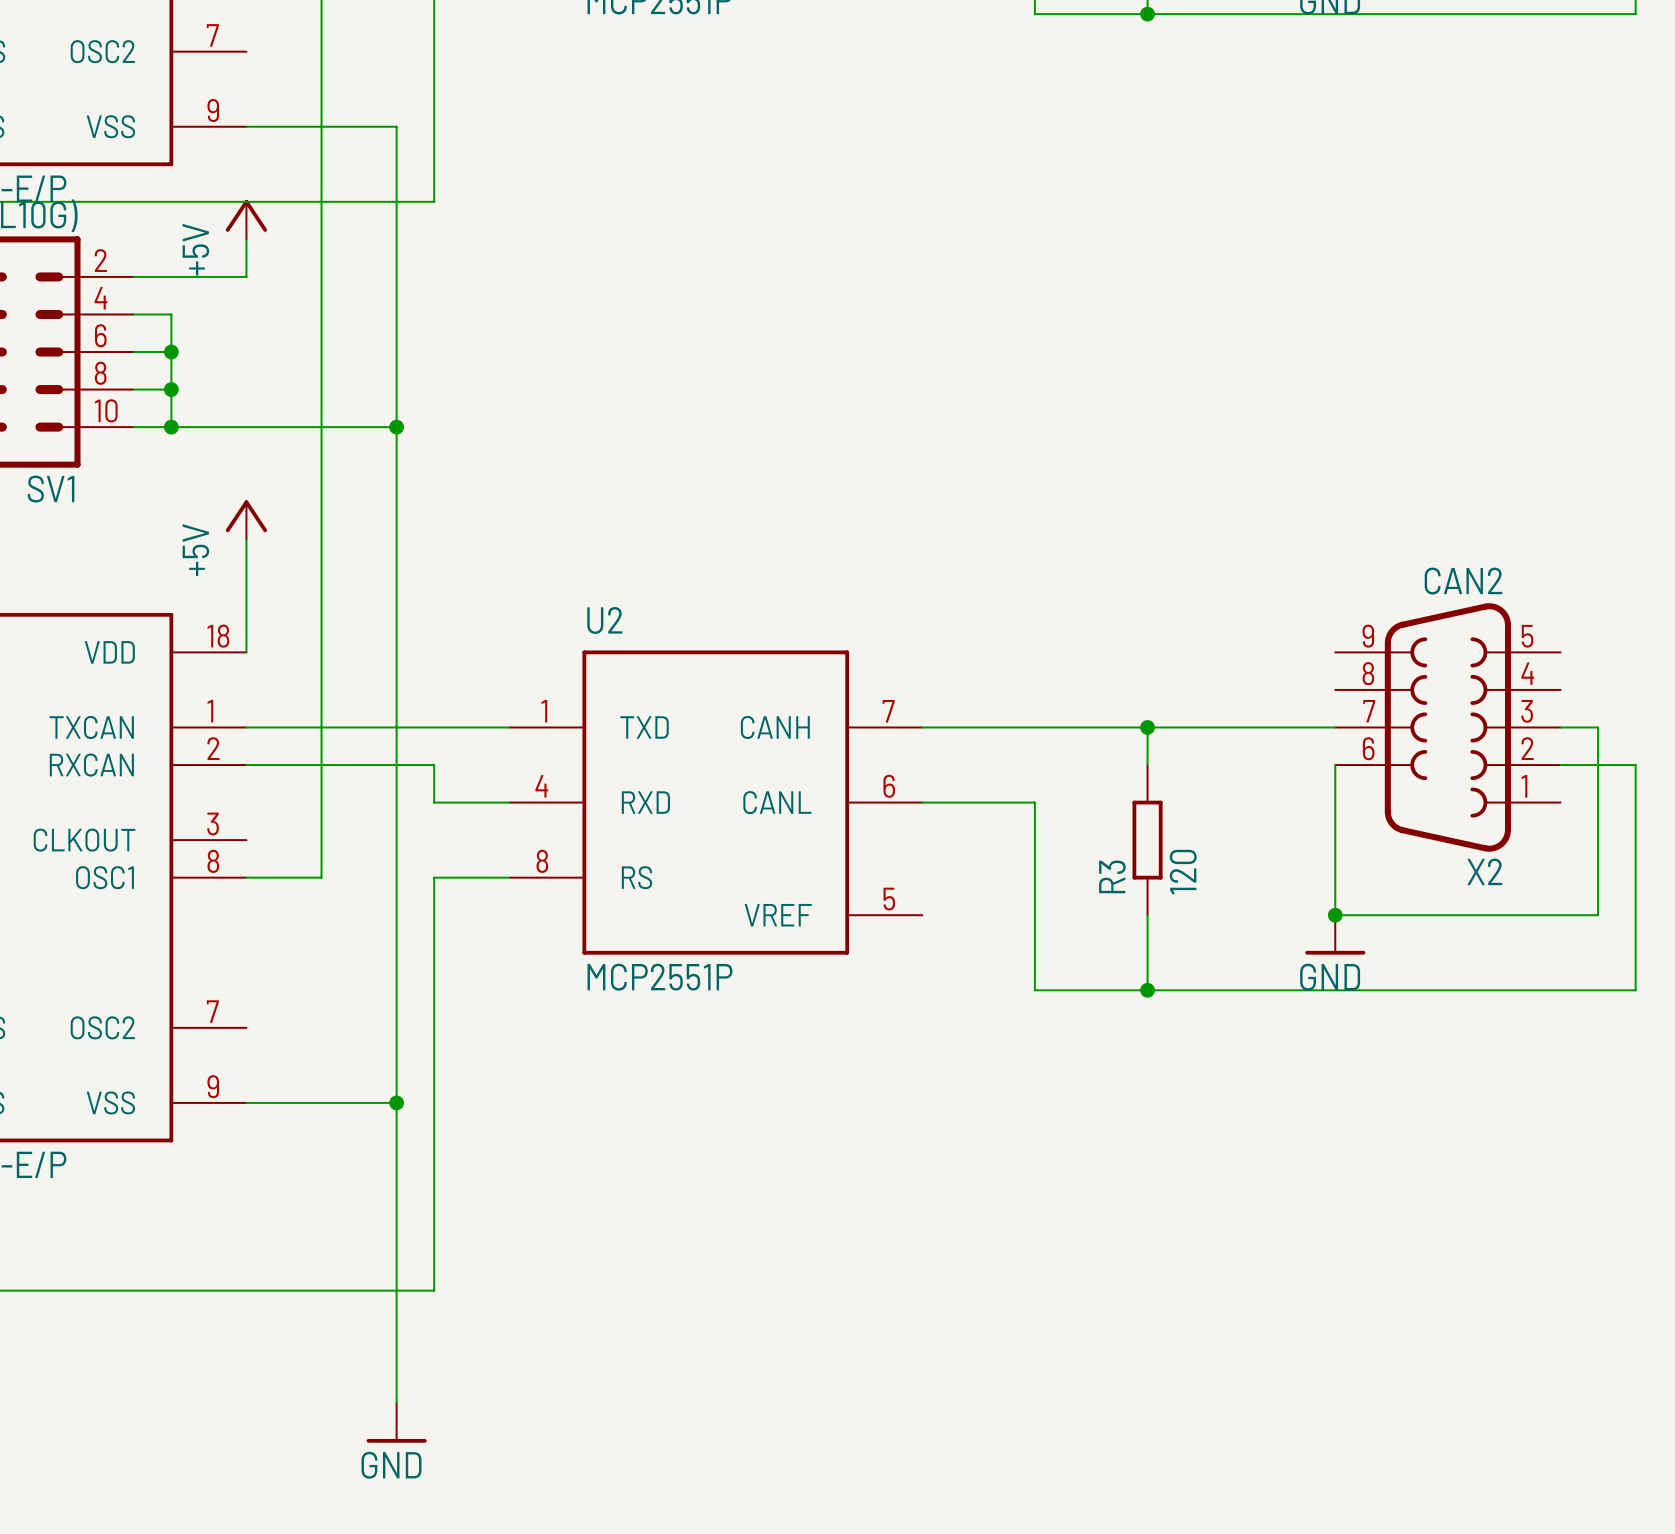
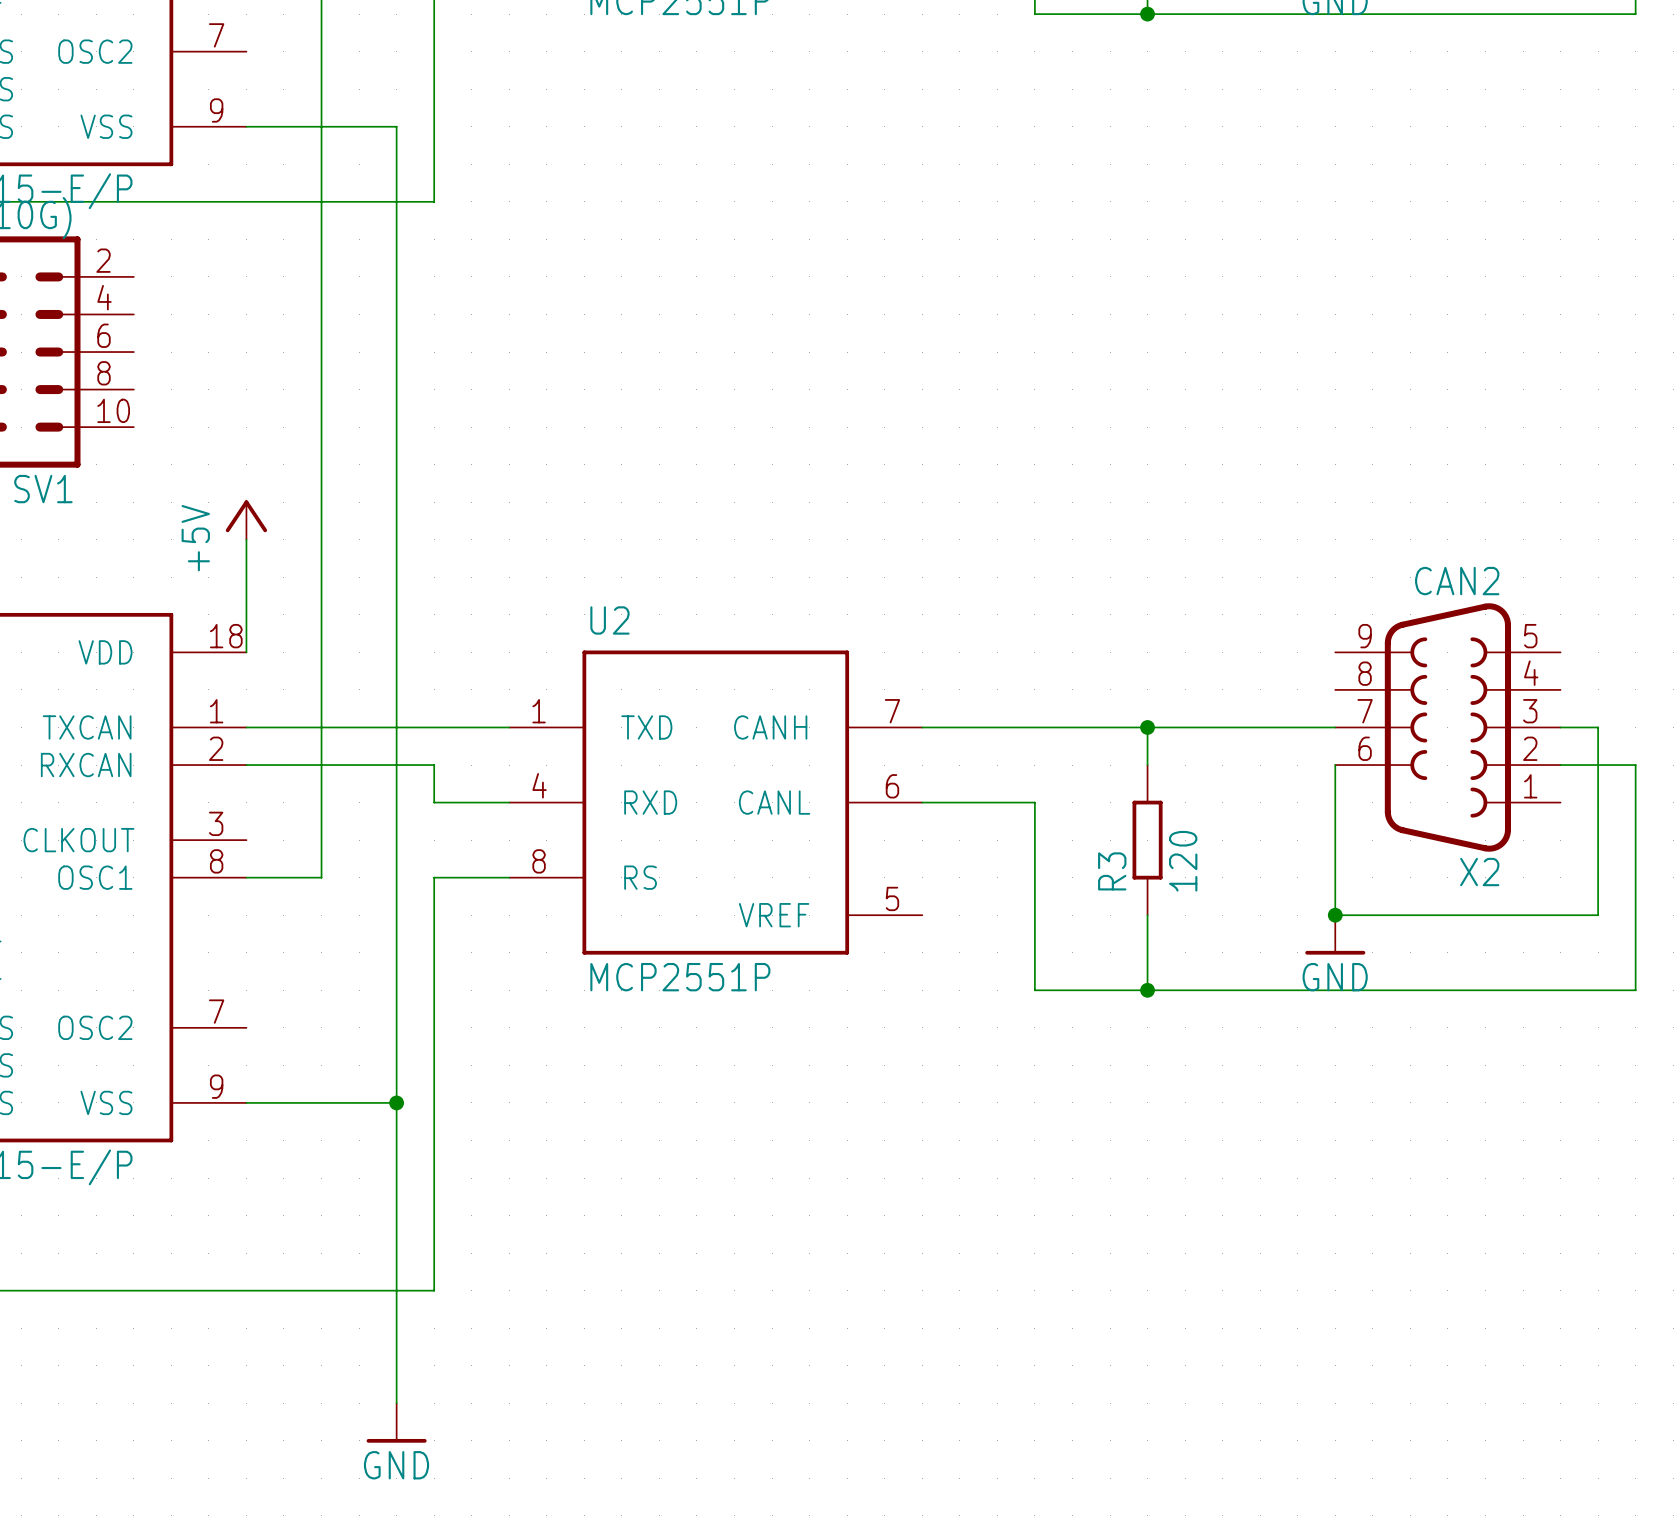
power symbol: +5V (246, 219) -> none
wire: (246, 239) (246, 276) (133, 276) -> none
wire: (133, 314) (171, 314) (171, 427) -> none
wire: (133, 352) (171, 352) -> none
junction: (171, 352) -> none
wire: (133, 389) (171, 389) -> none
junction: (171, 389) -> none
wire: (133, 427) (396, 427) -> none
junction: (171, 427) -> none
junction: (396, 427) -> none

